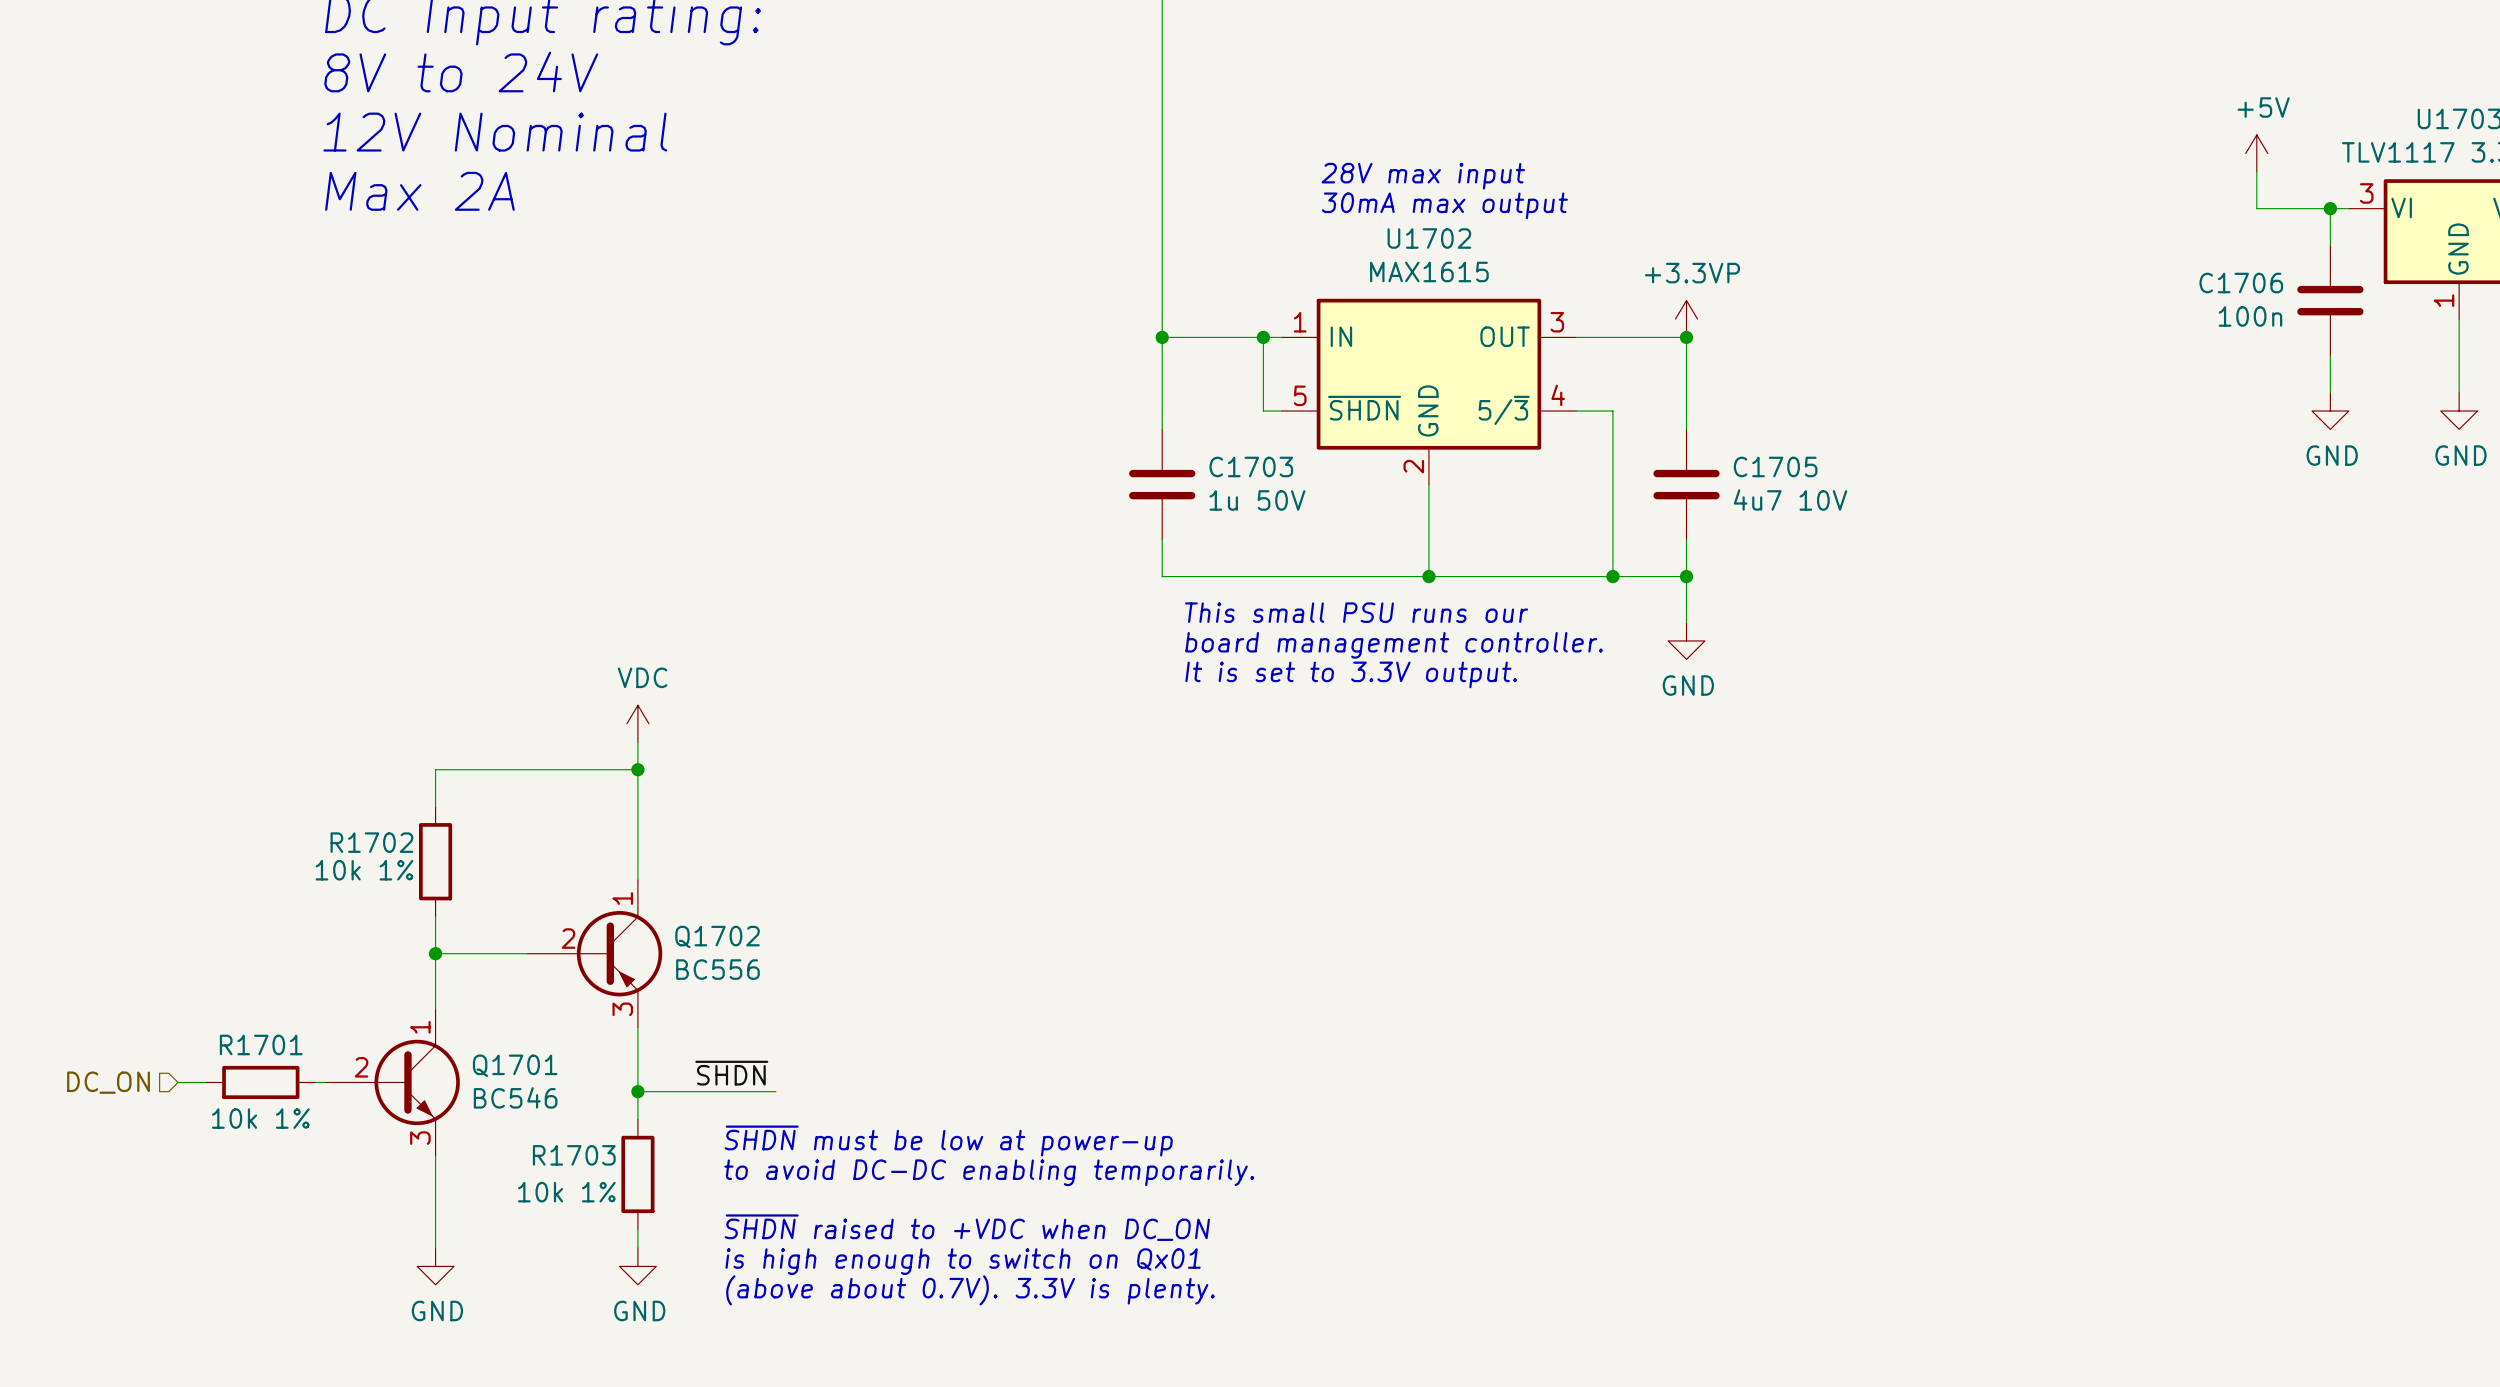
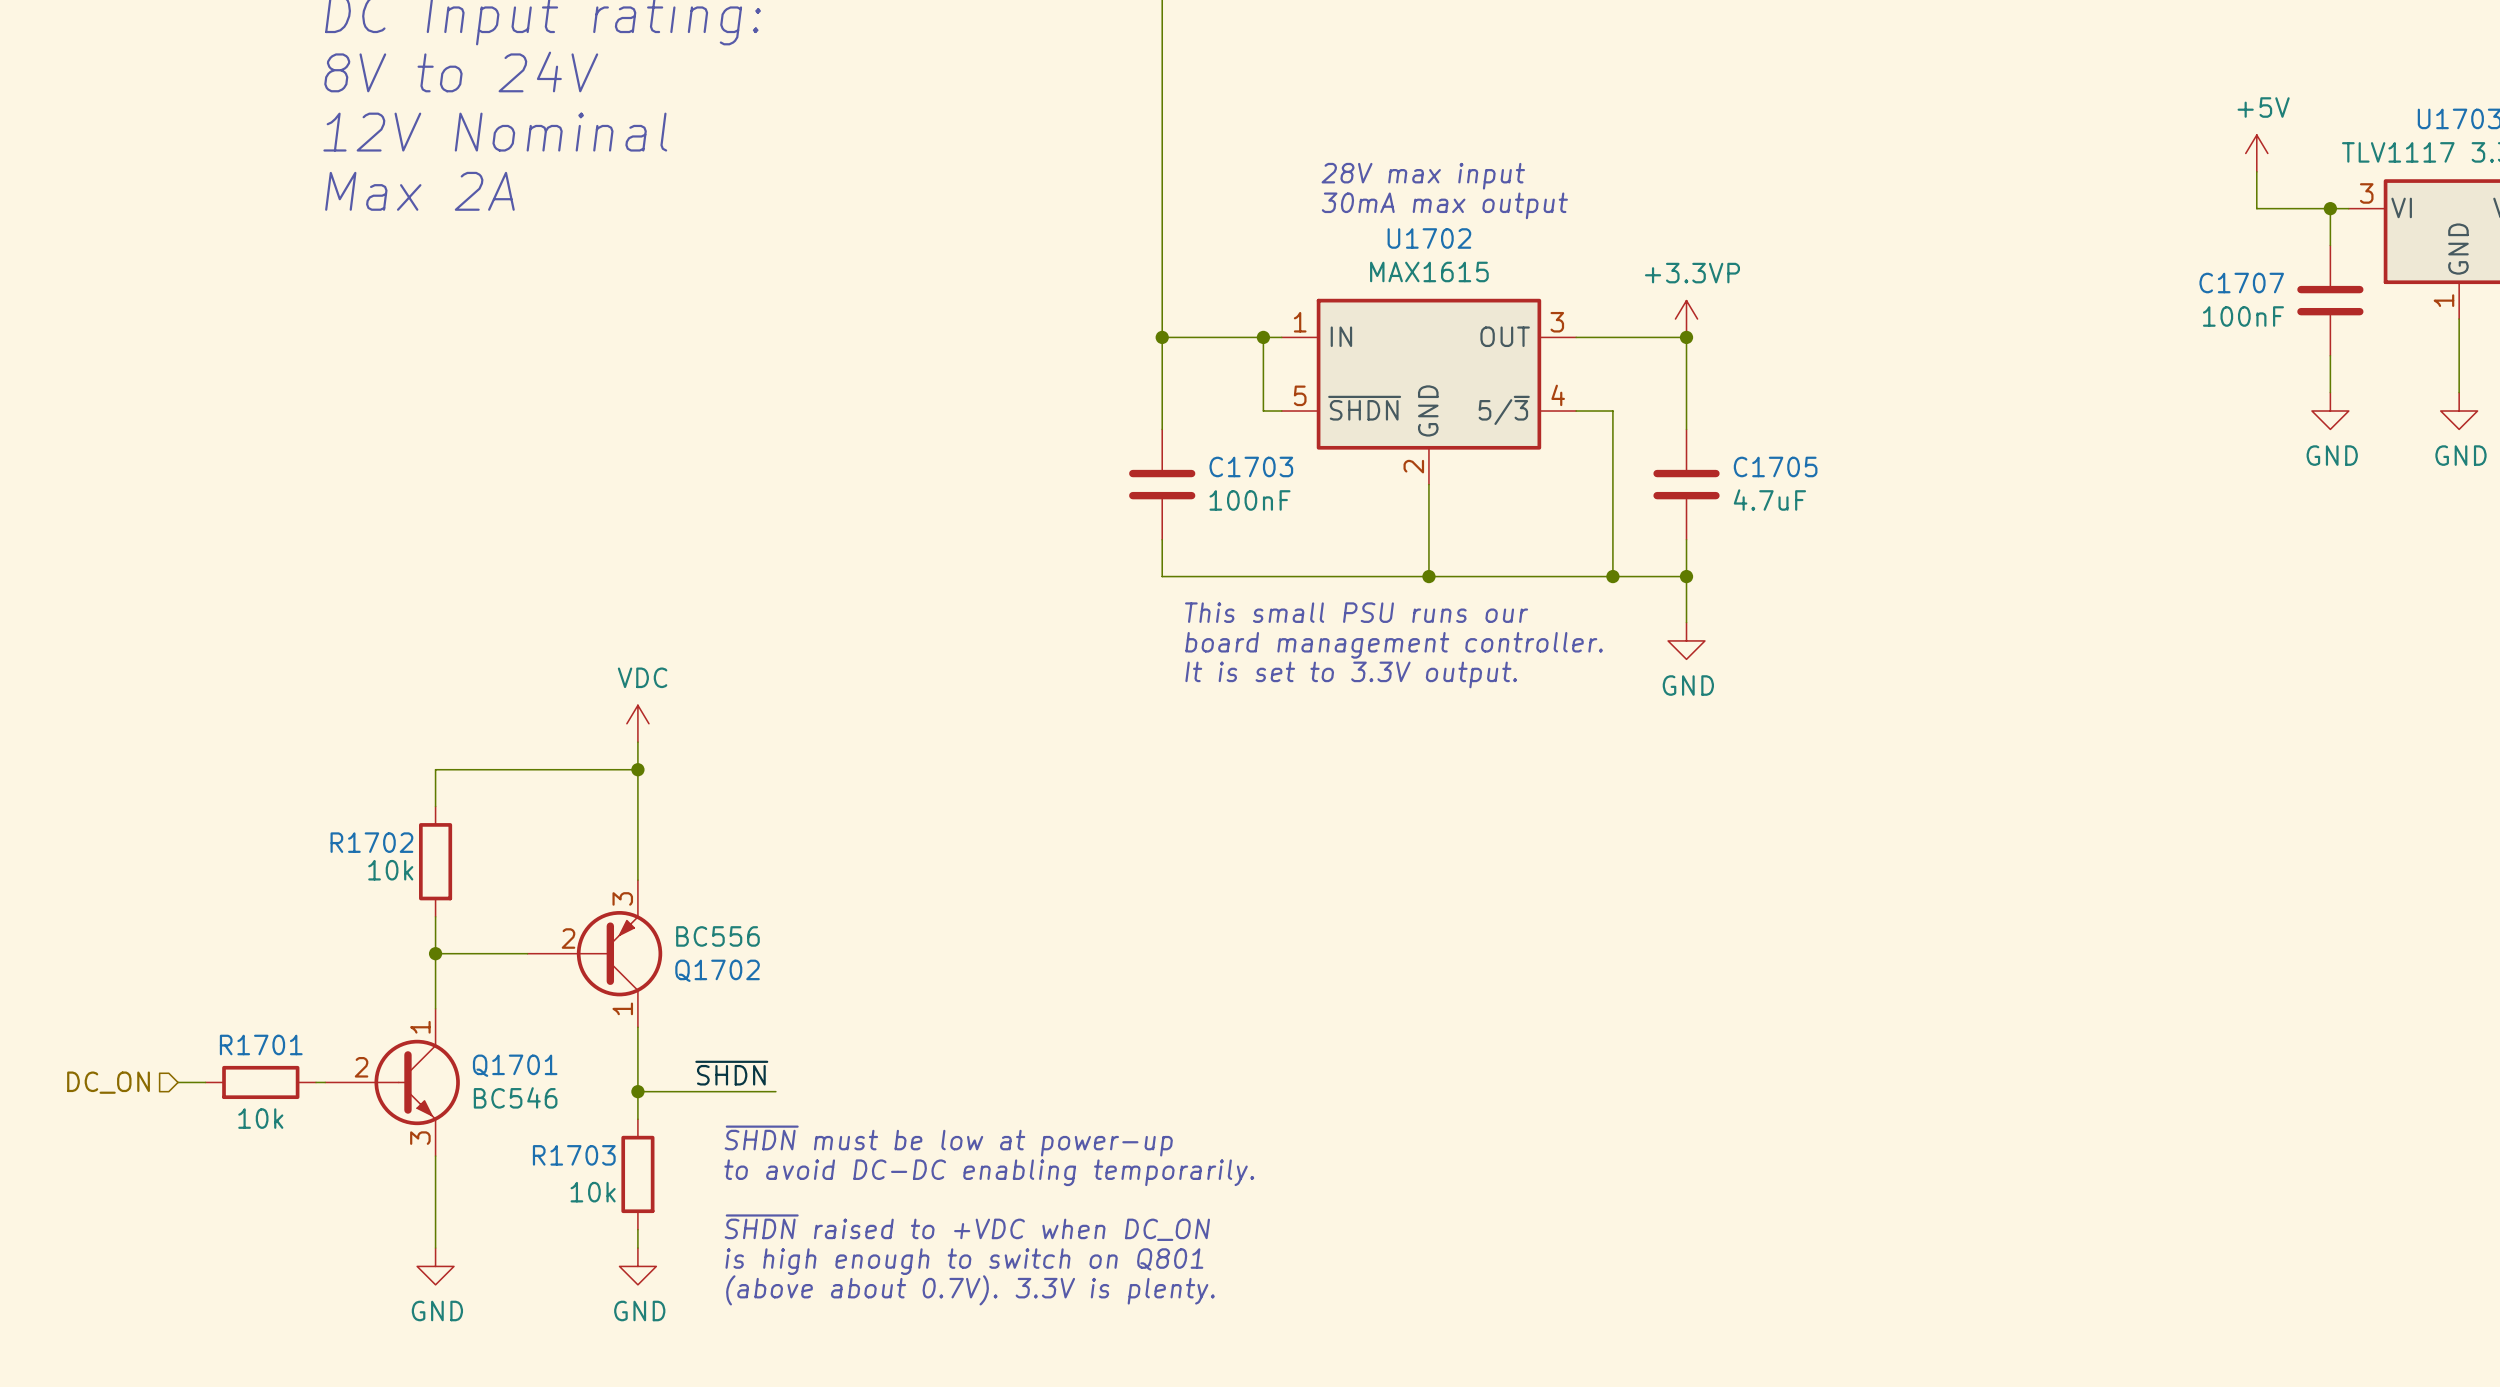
C1706 name: C1706 (2241, 283) -> C1707 (2241, 283)
C1706 value: 100n (2250, 316) -> 100nF (2243, 316)
C1703 value: 1u 50V (1257, 500) -> 100nF (1250, 500)
C1705 value: 4u7 10V (1790, 500) -> 4.7uF (1769, 500)
R1702 value: 10k 1% (364, 870) -> 10k (390, 870)
Q1702 flip: as is (619, 953) -> up-down (619, 953)
R1701 value: 10k 1% (260, 1118) -> 10k (260, 1118)
R1703 value: 10k 1% (566, 1192) -> 10k (593, 1192)
text: is high enough to switch on Qx01 (963, 1261) -> is high enough to switch on Q801 (964, 1261)

